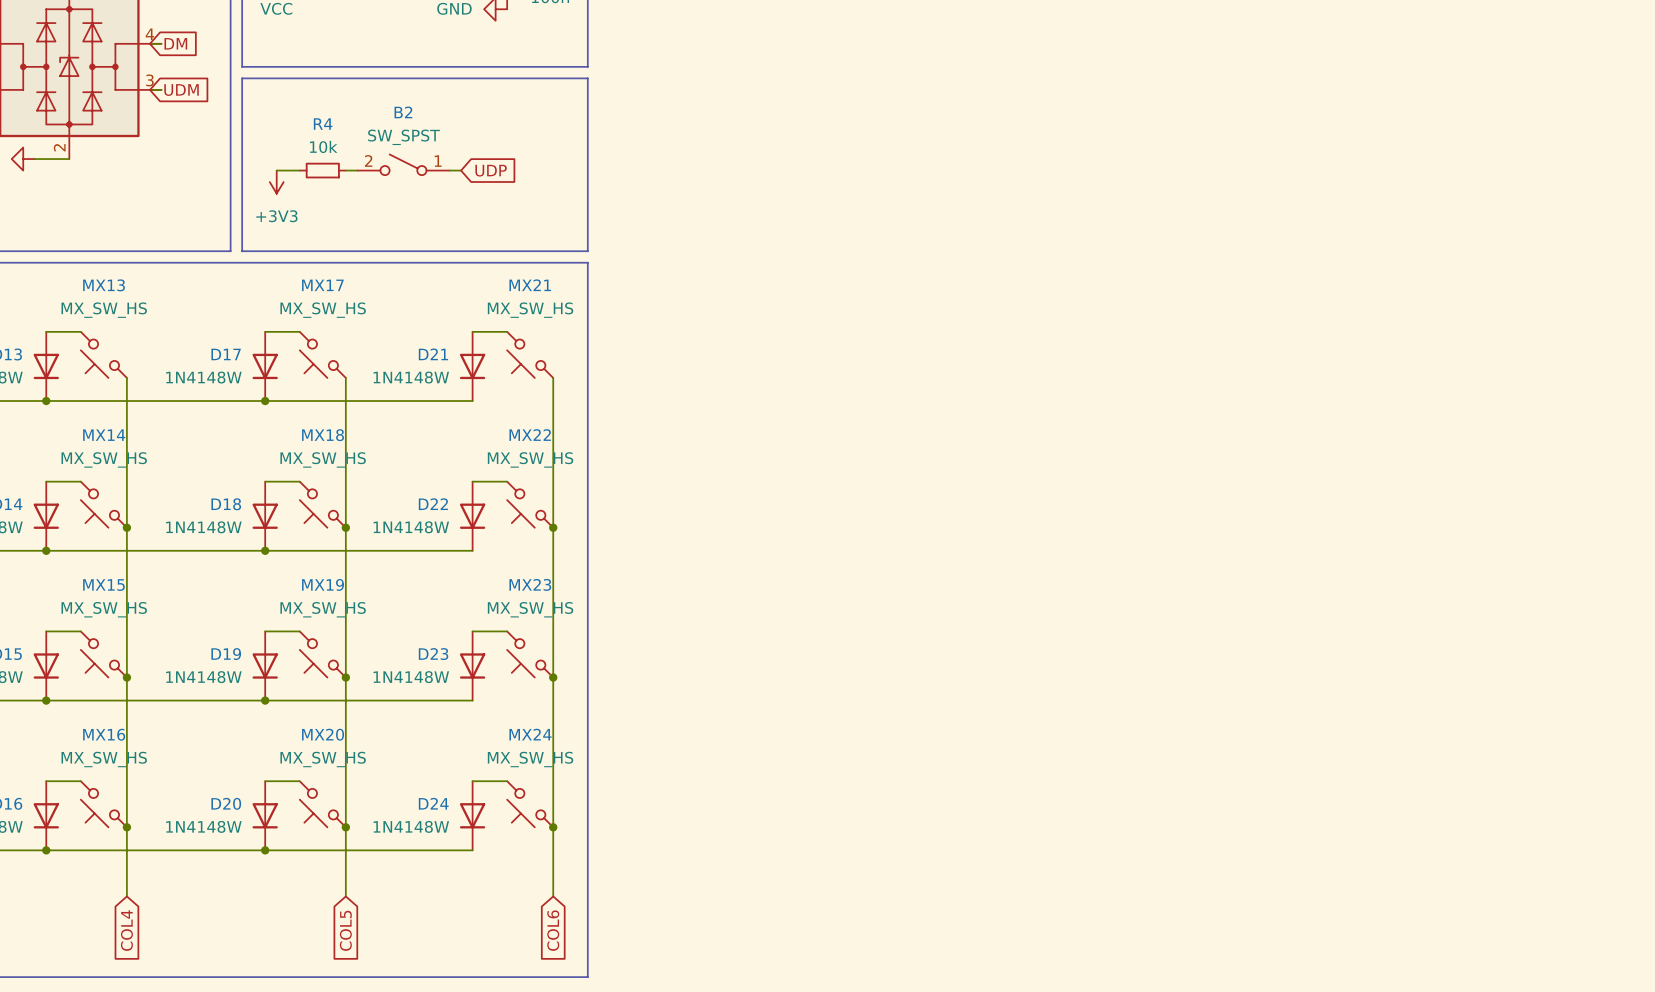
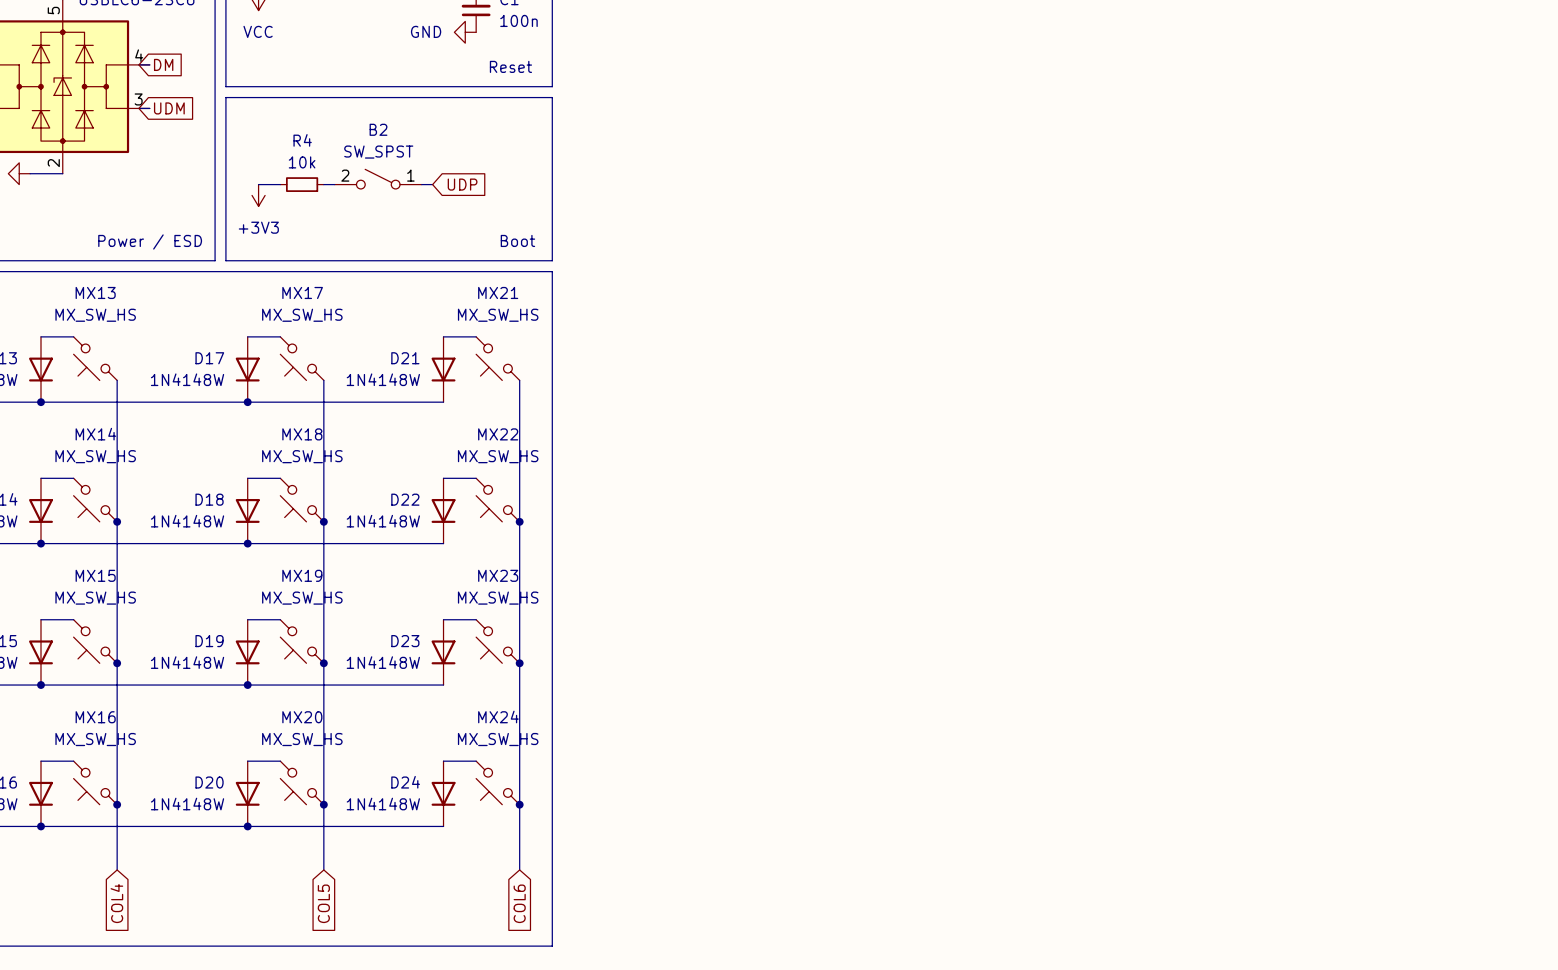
text: none -> Reset (510, 66)
text: none -> Power / ESD (150, 241)
text: none -> Boot (517, 240)

